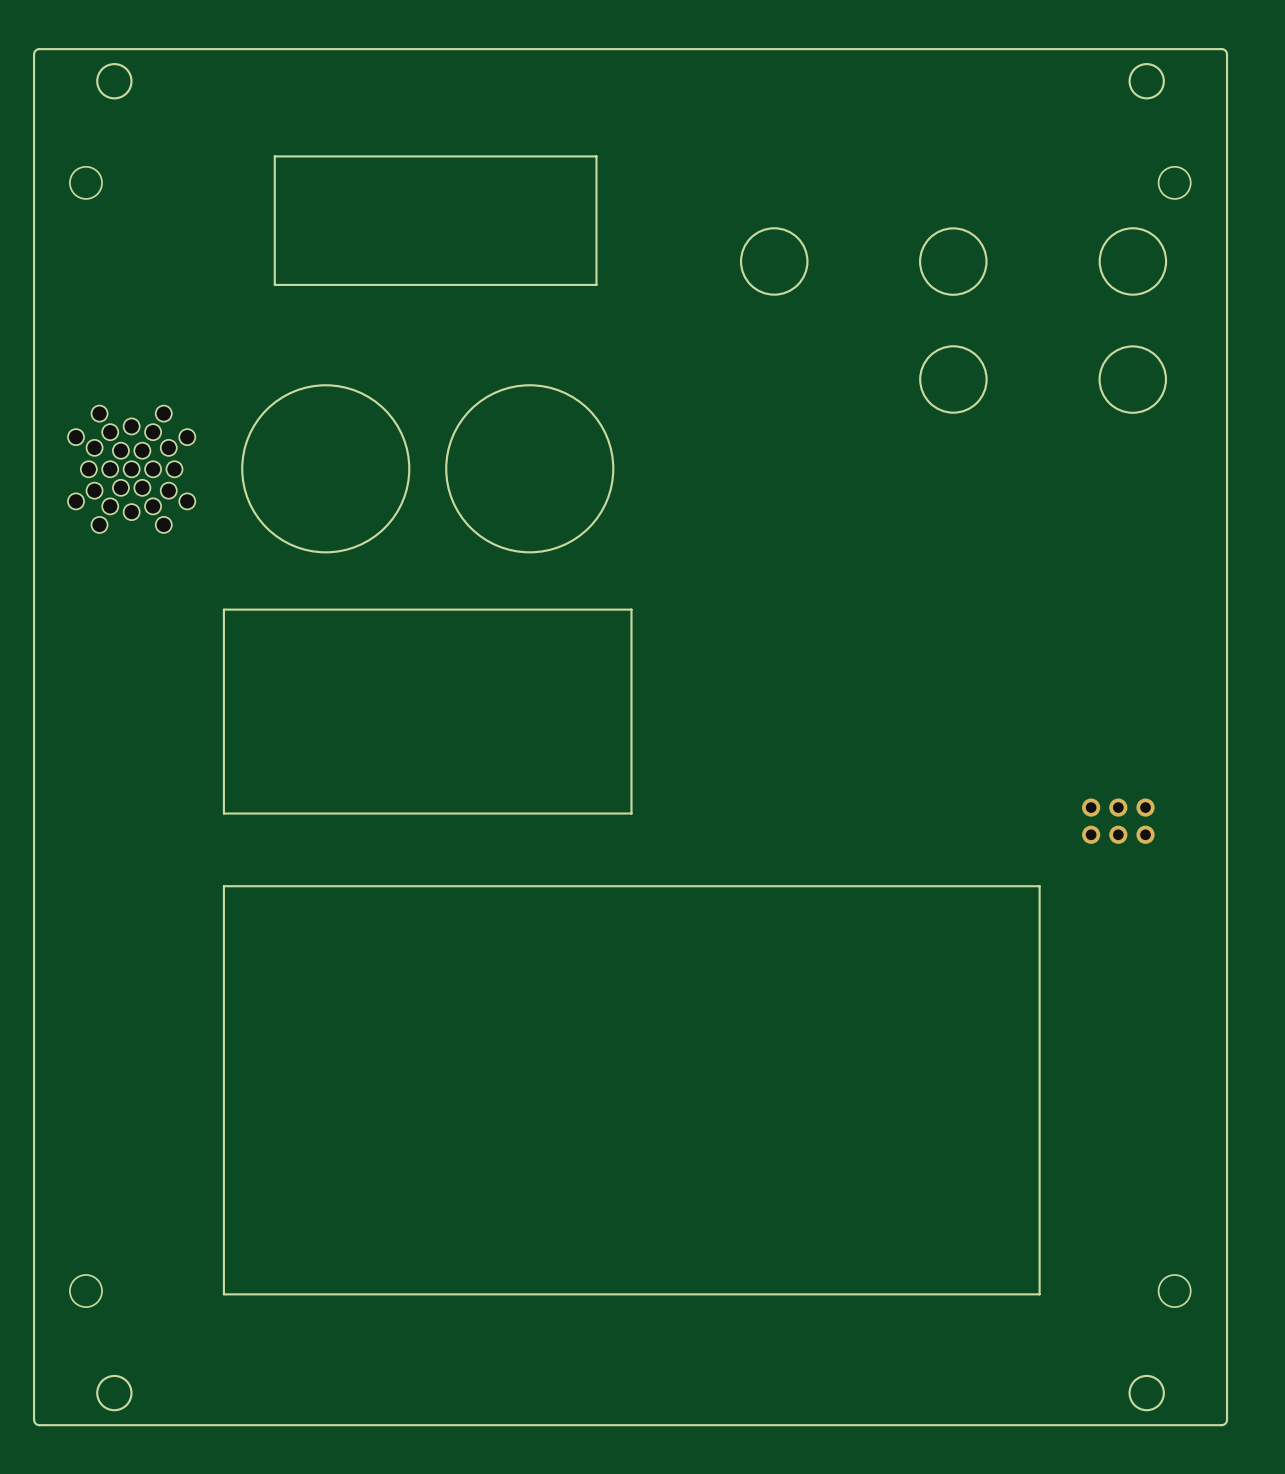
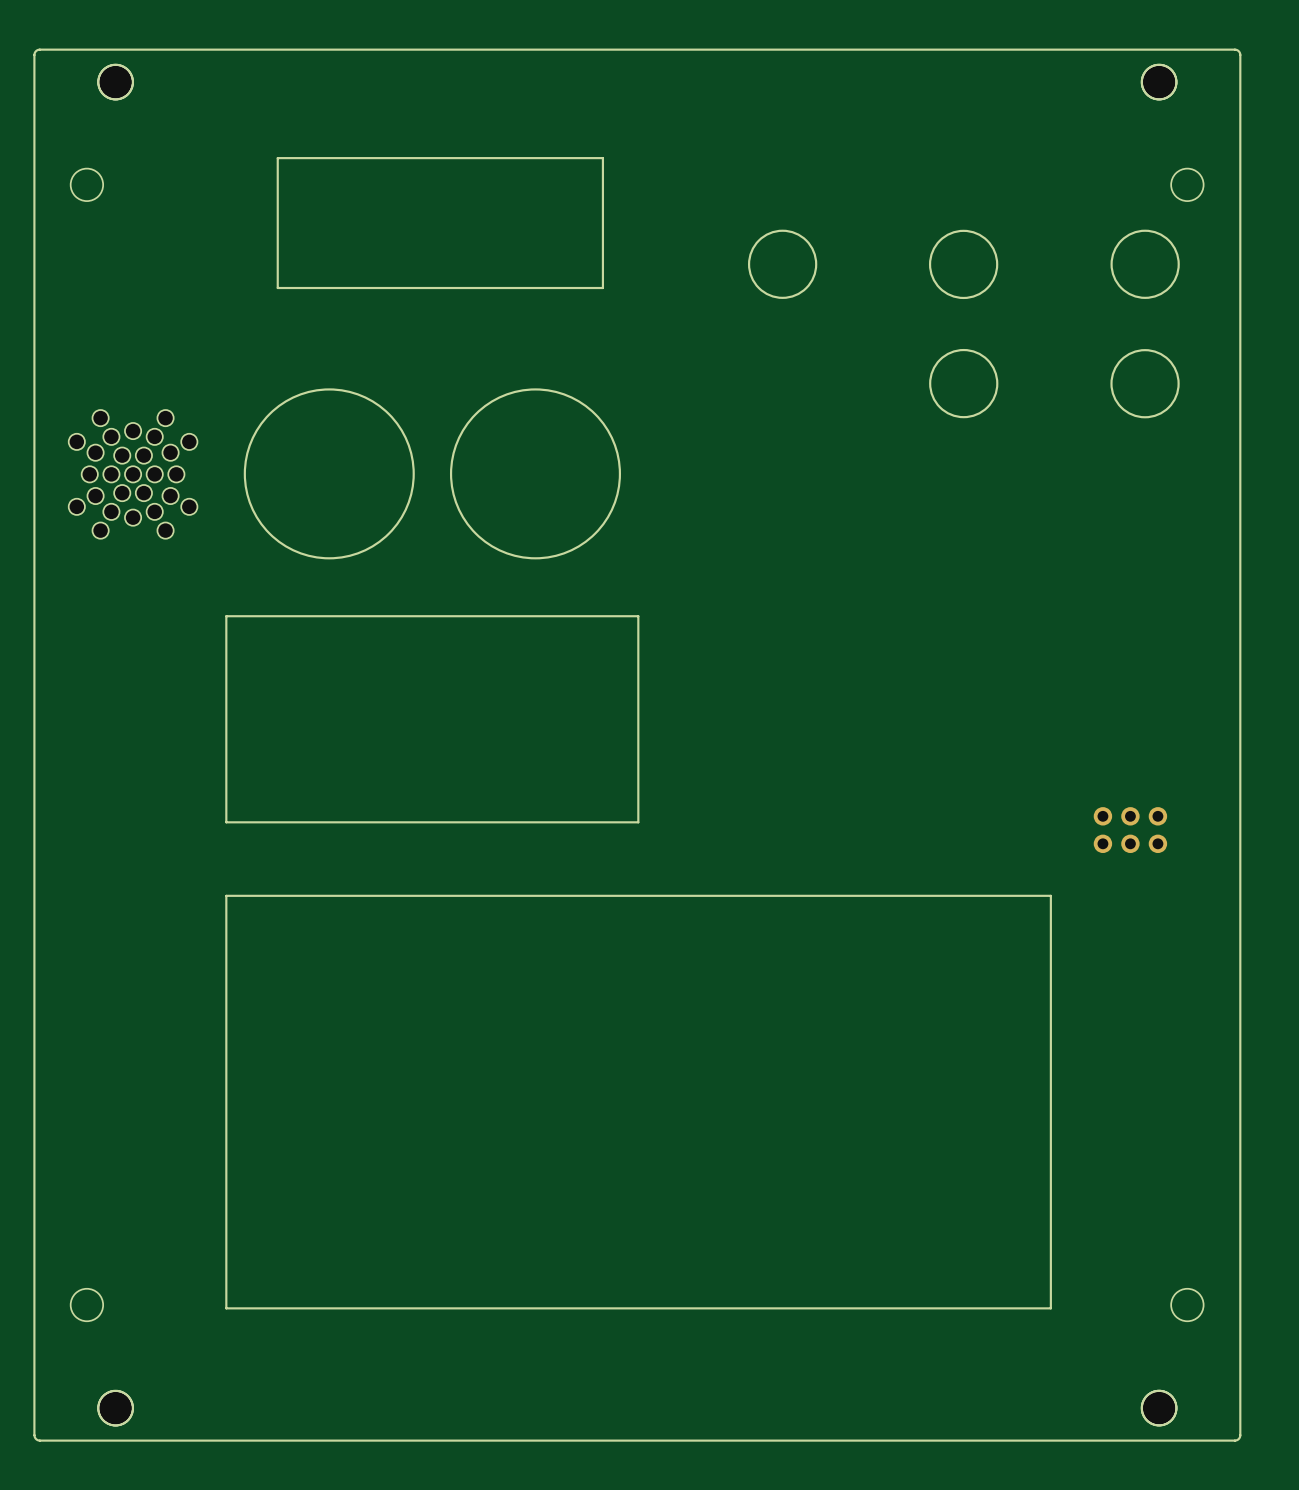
part: none -> (115, 82)
part: none -> (1159, 82)
part: none -> (1159, 1408)
part: none -> (115, 1408)

